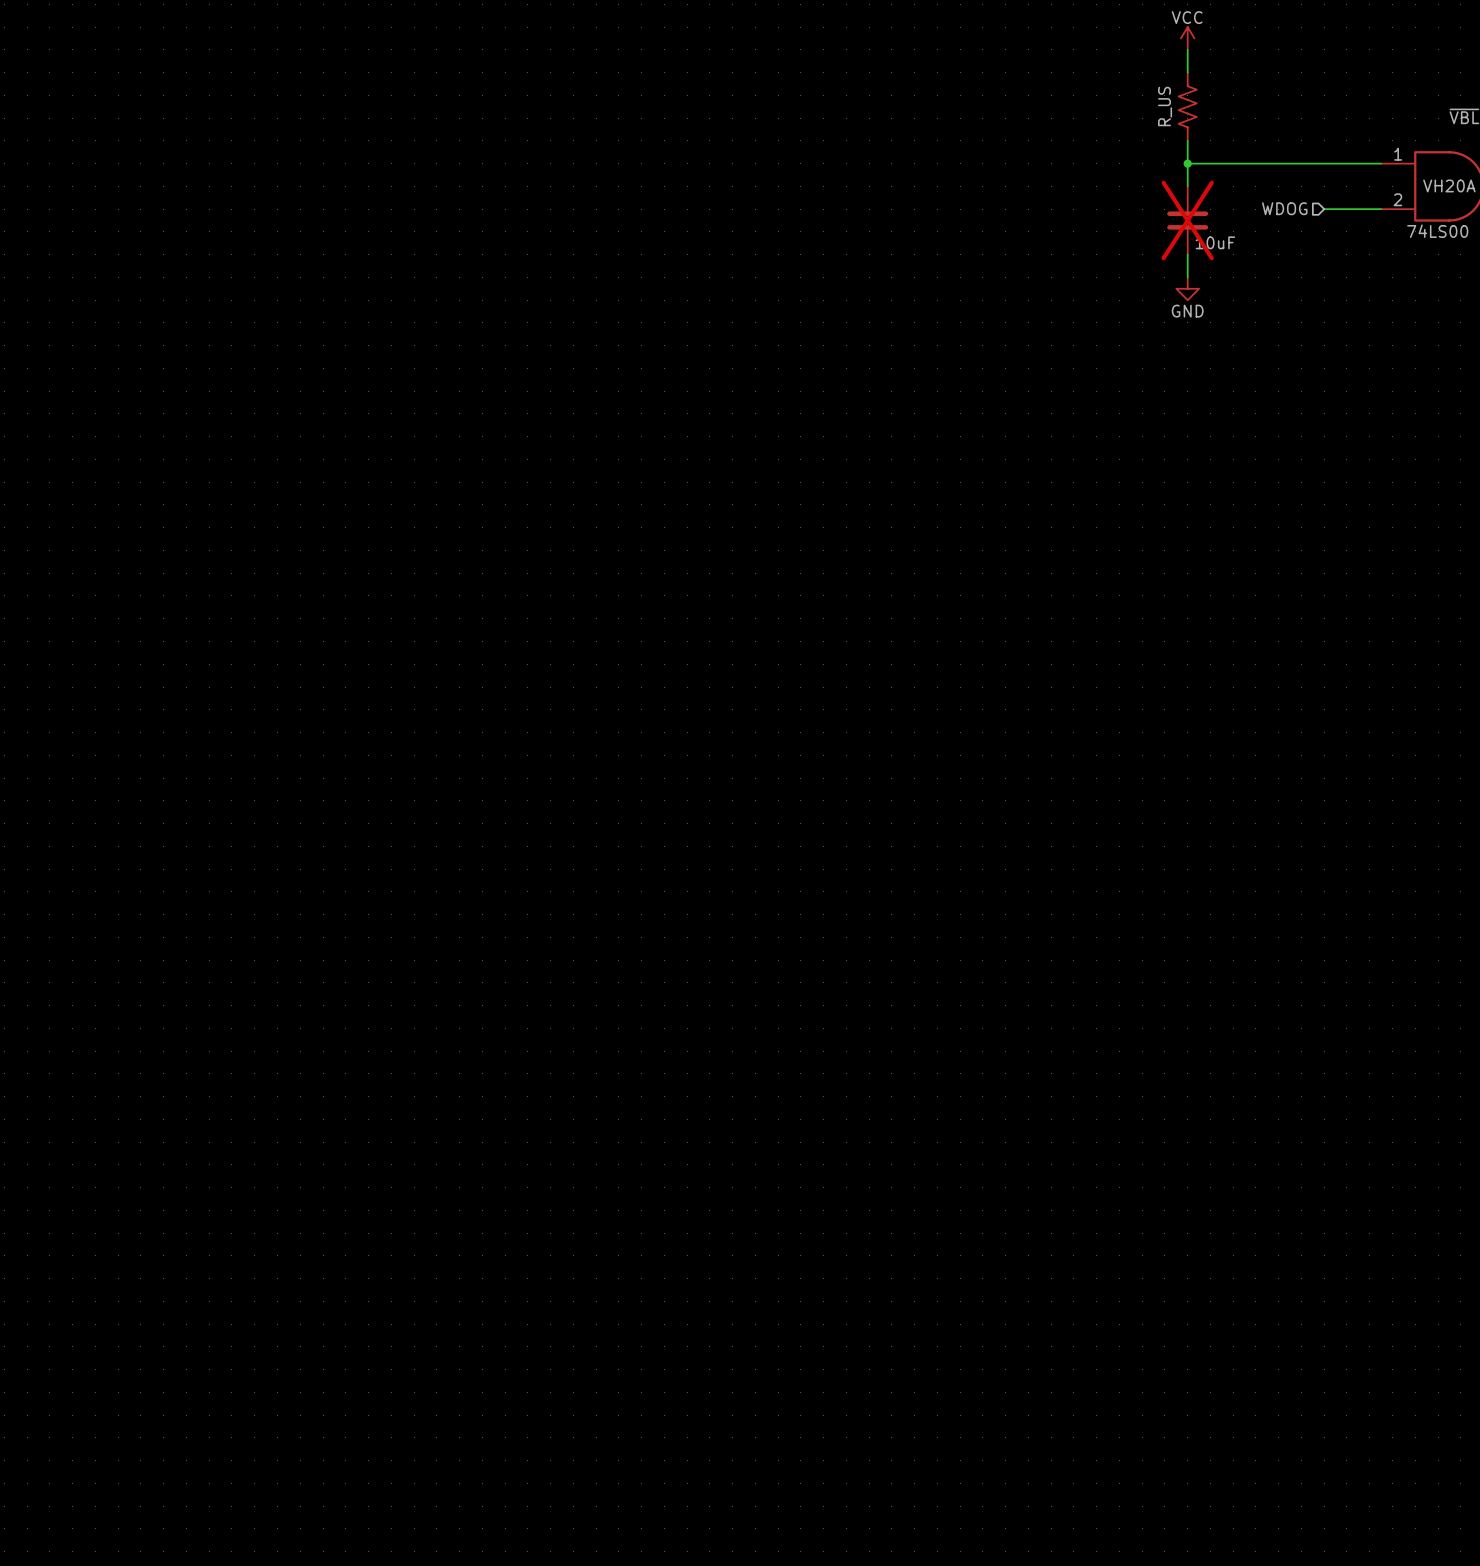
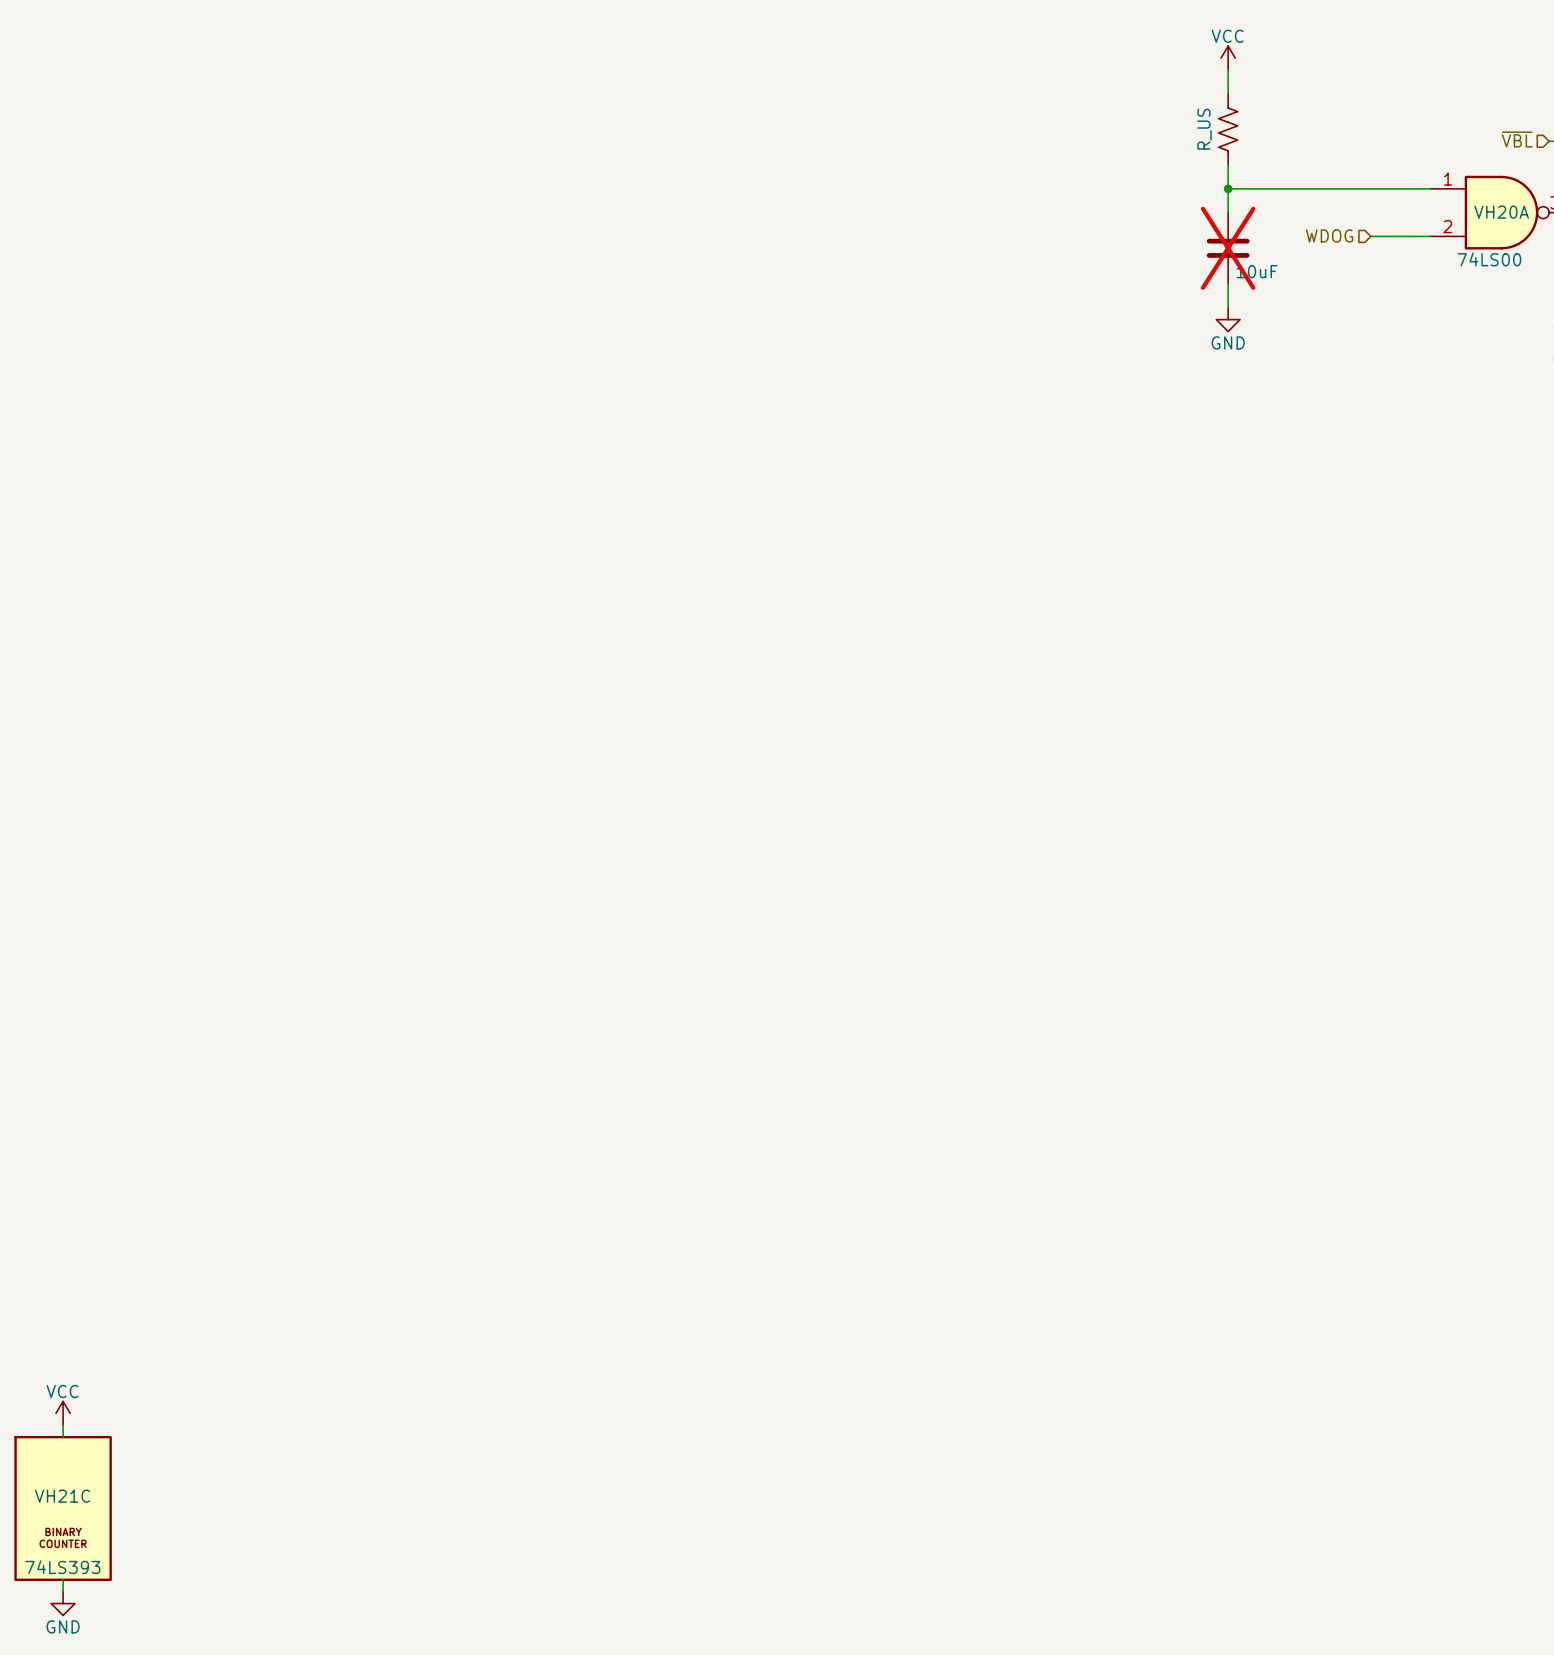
power symbol: none -> VCC (63, 1413)
wire: none -> (63, 1425) (63, 1437)
VH21C: none -> 74LS393 (63, 1508)
wire: none -> (63, 1579) (63, 1591)
power symbol: none -> GND (63, 1603)

